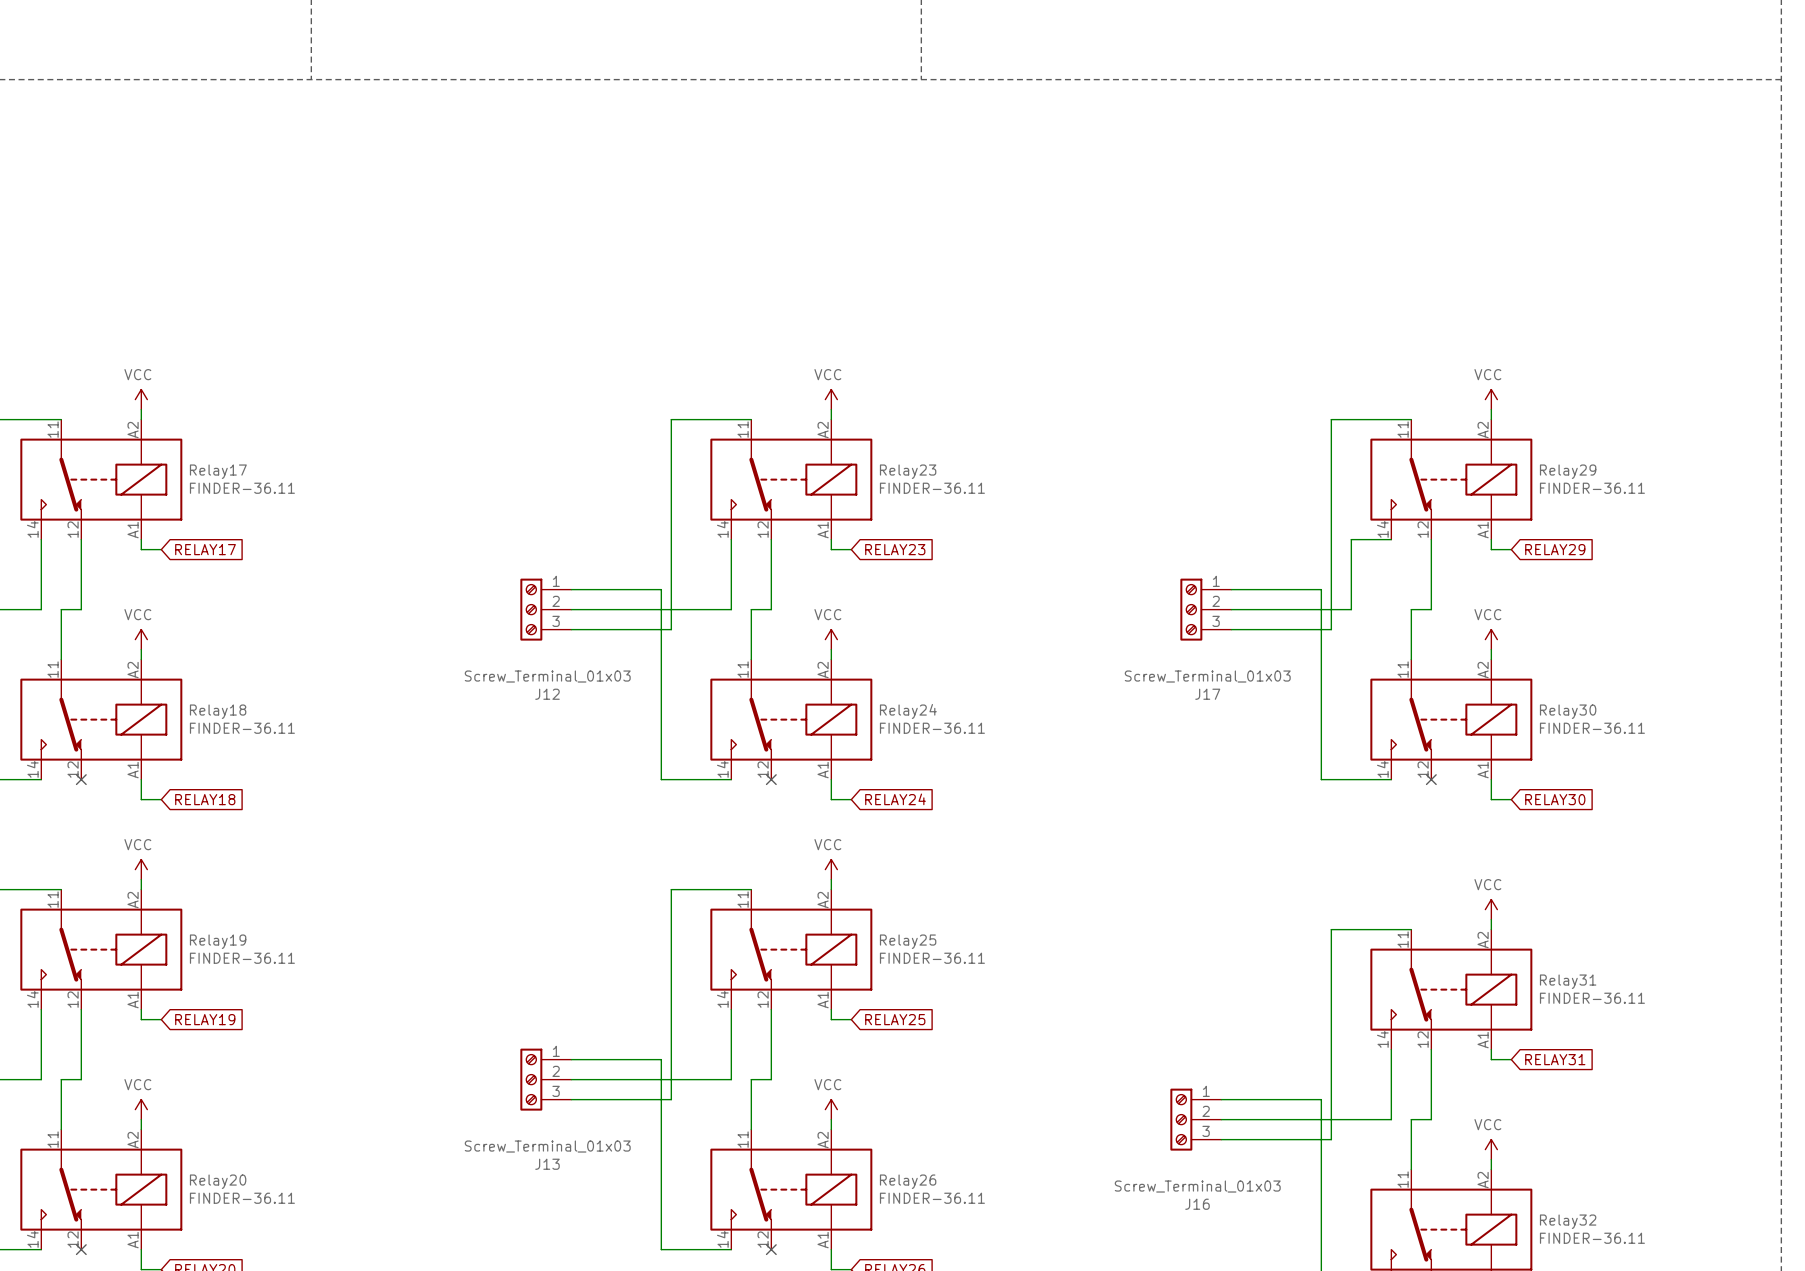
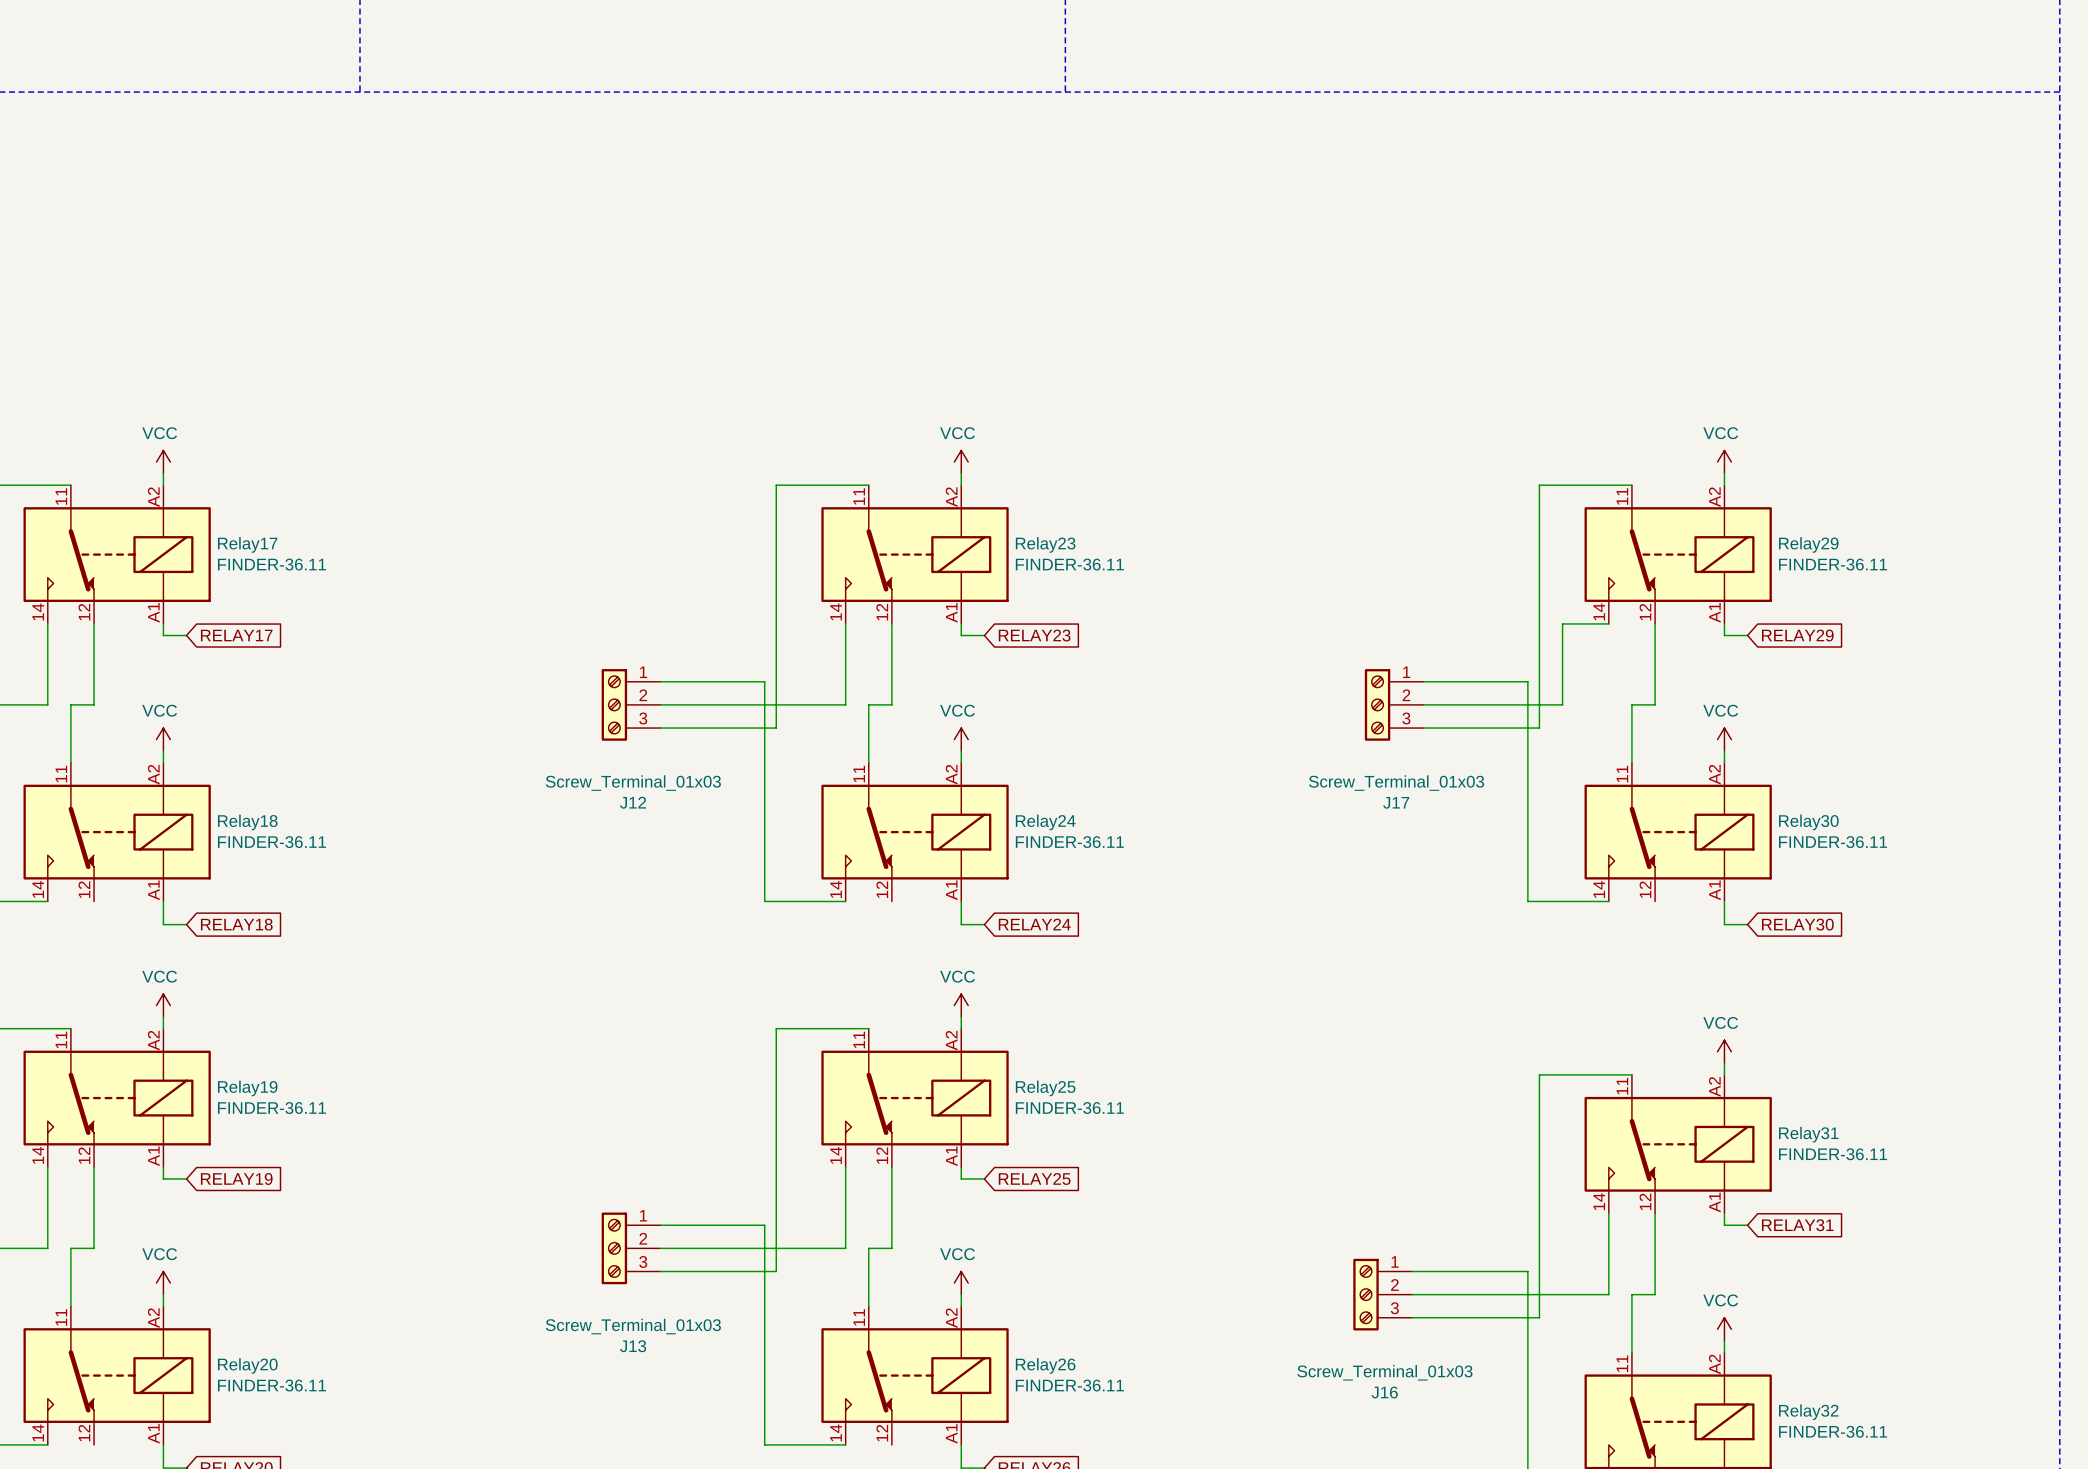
no-connect mark: (81, 779) -> none
no-connect mark: (771, 779) -> none
no-connect mark: (1431, 779) -> none
no-connect mark: (81, 1249) -> none
no-connect mark: (771, 1249) -> none

